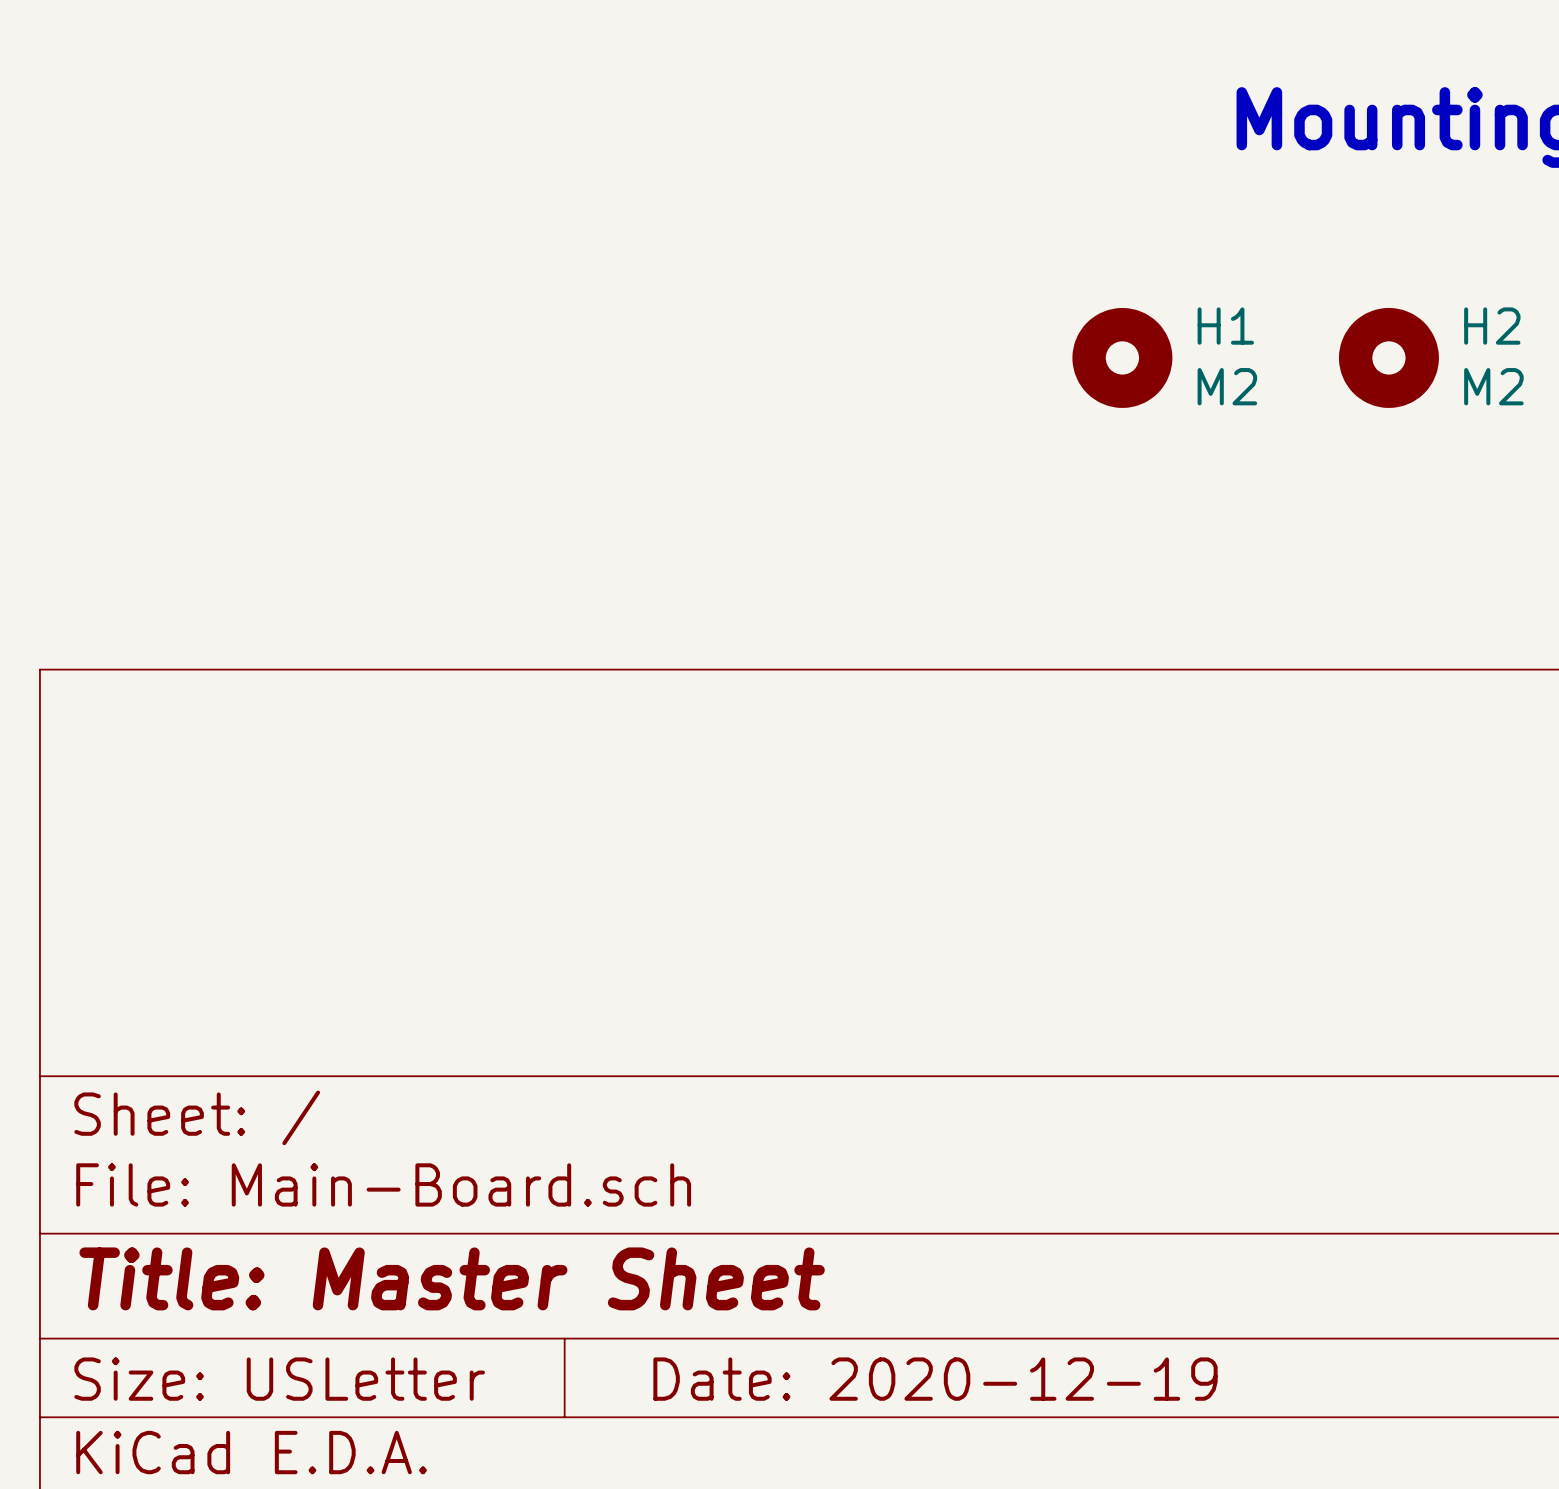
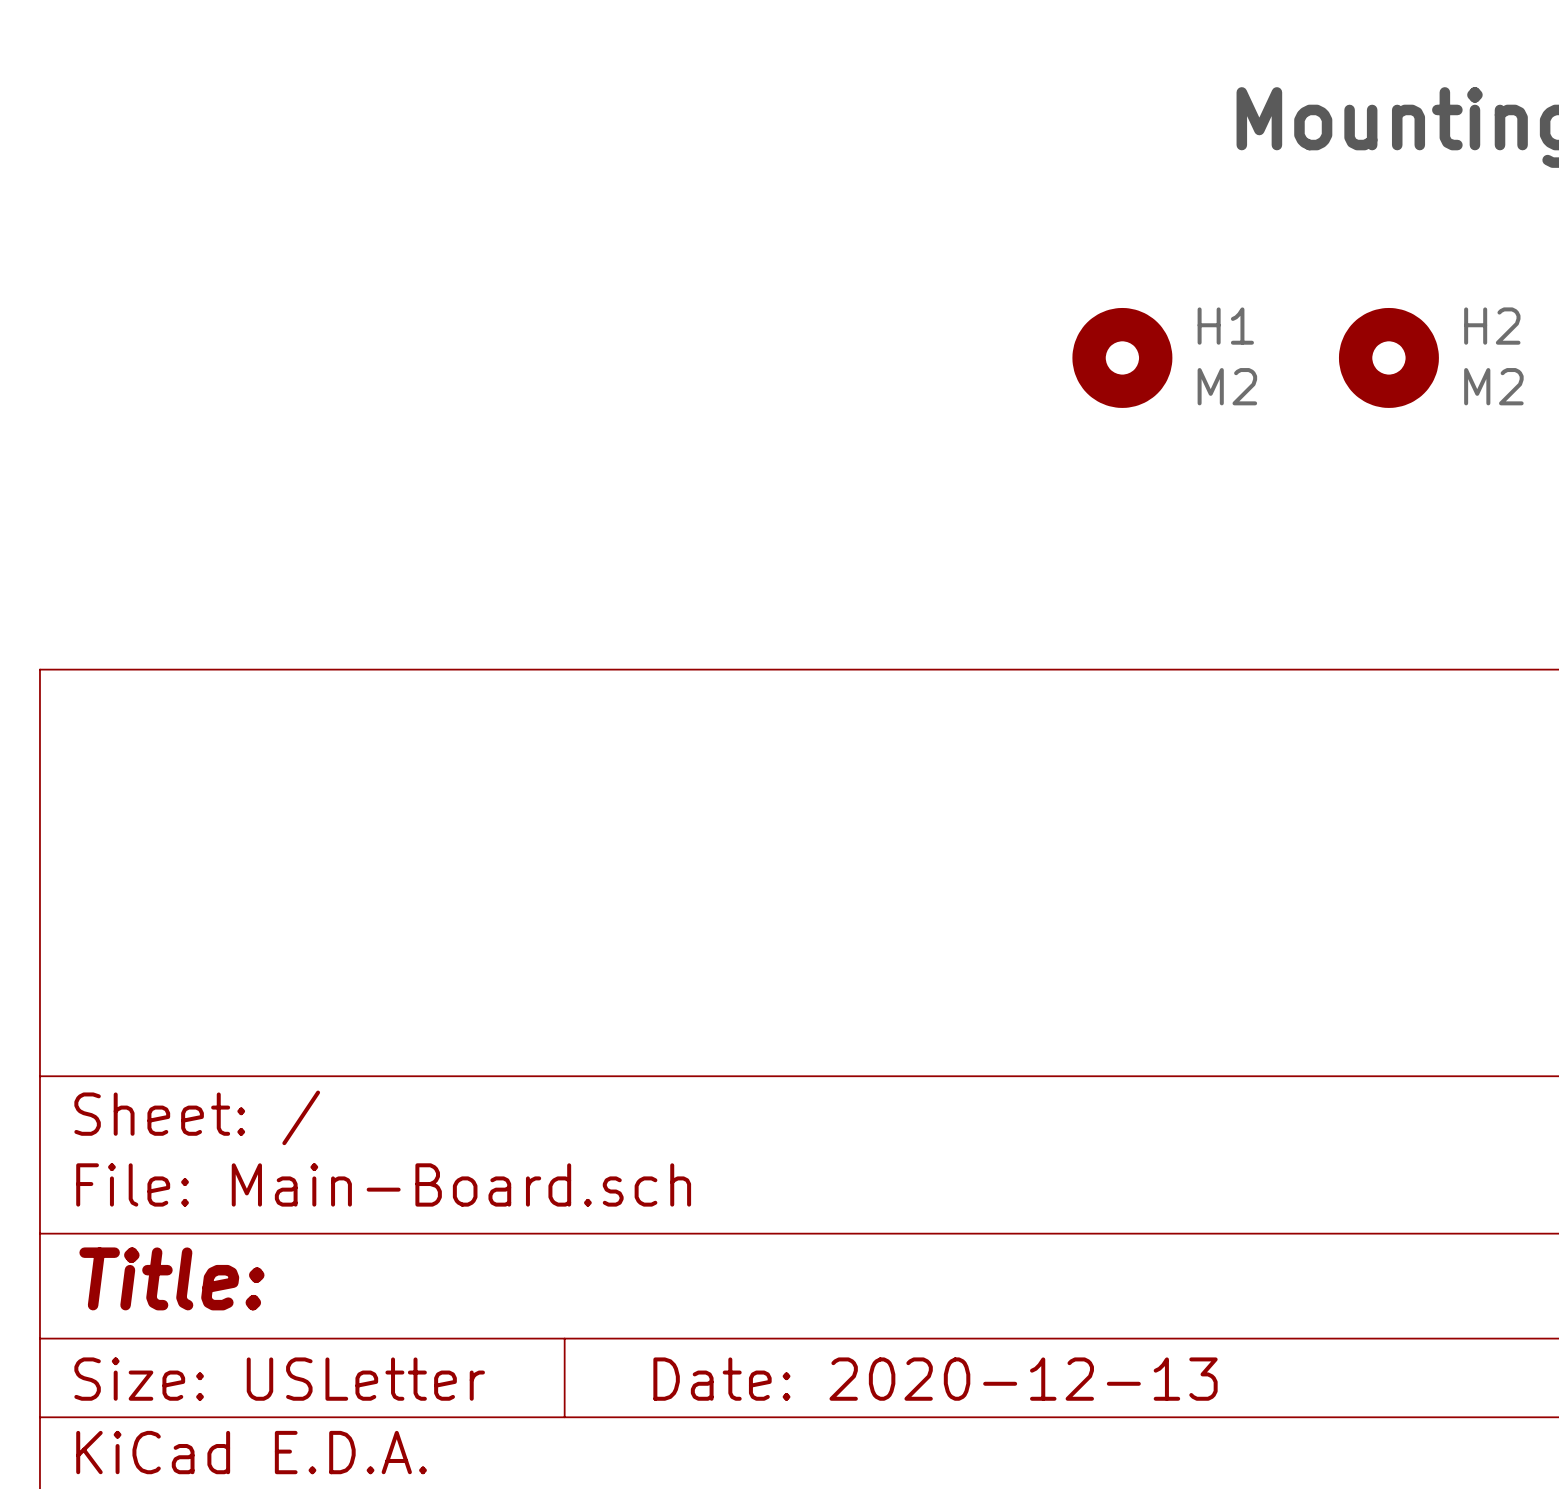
title block: Title: Master Sheet (452, 1278) -> Title: (171, 1278)
title block: Date: 2020-12-19 (935, 1379) -> Date: 2020-12-13 (935, 1379)

